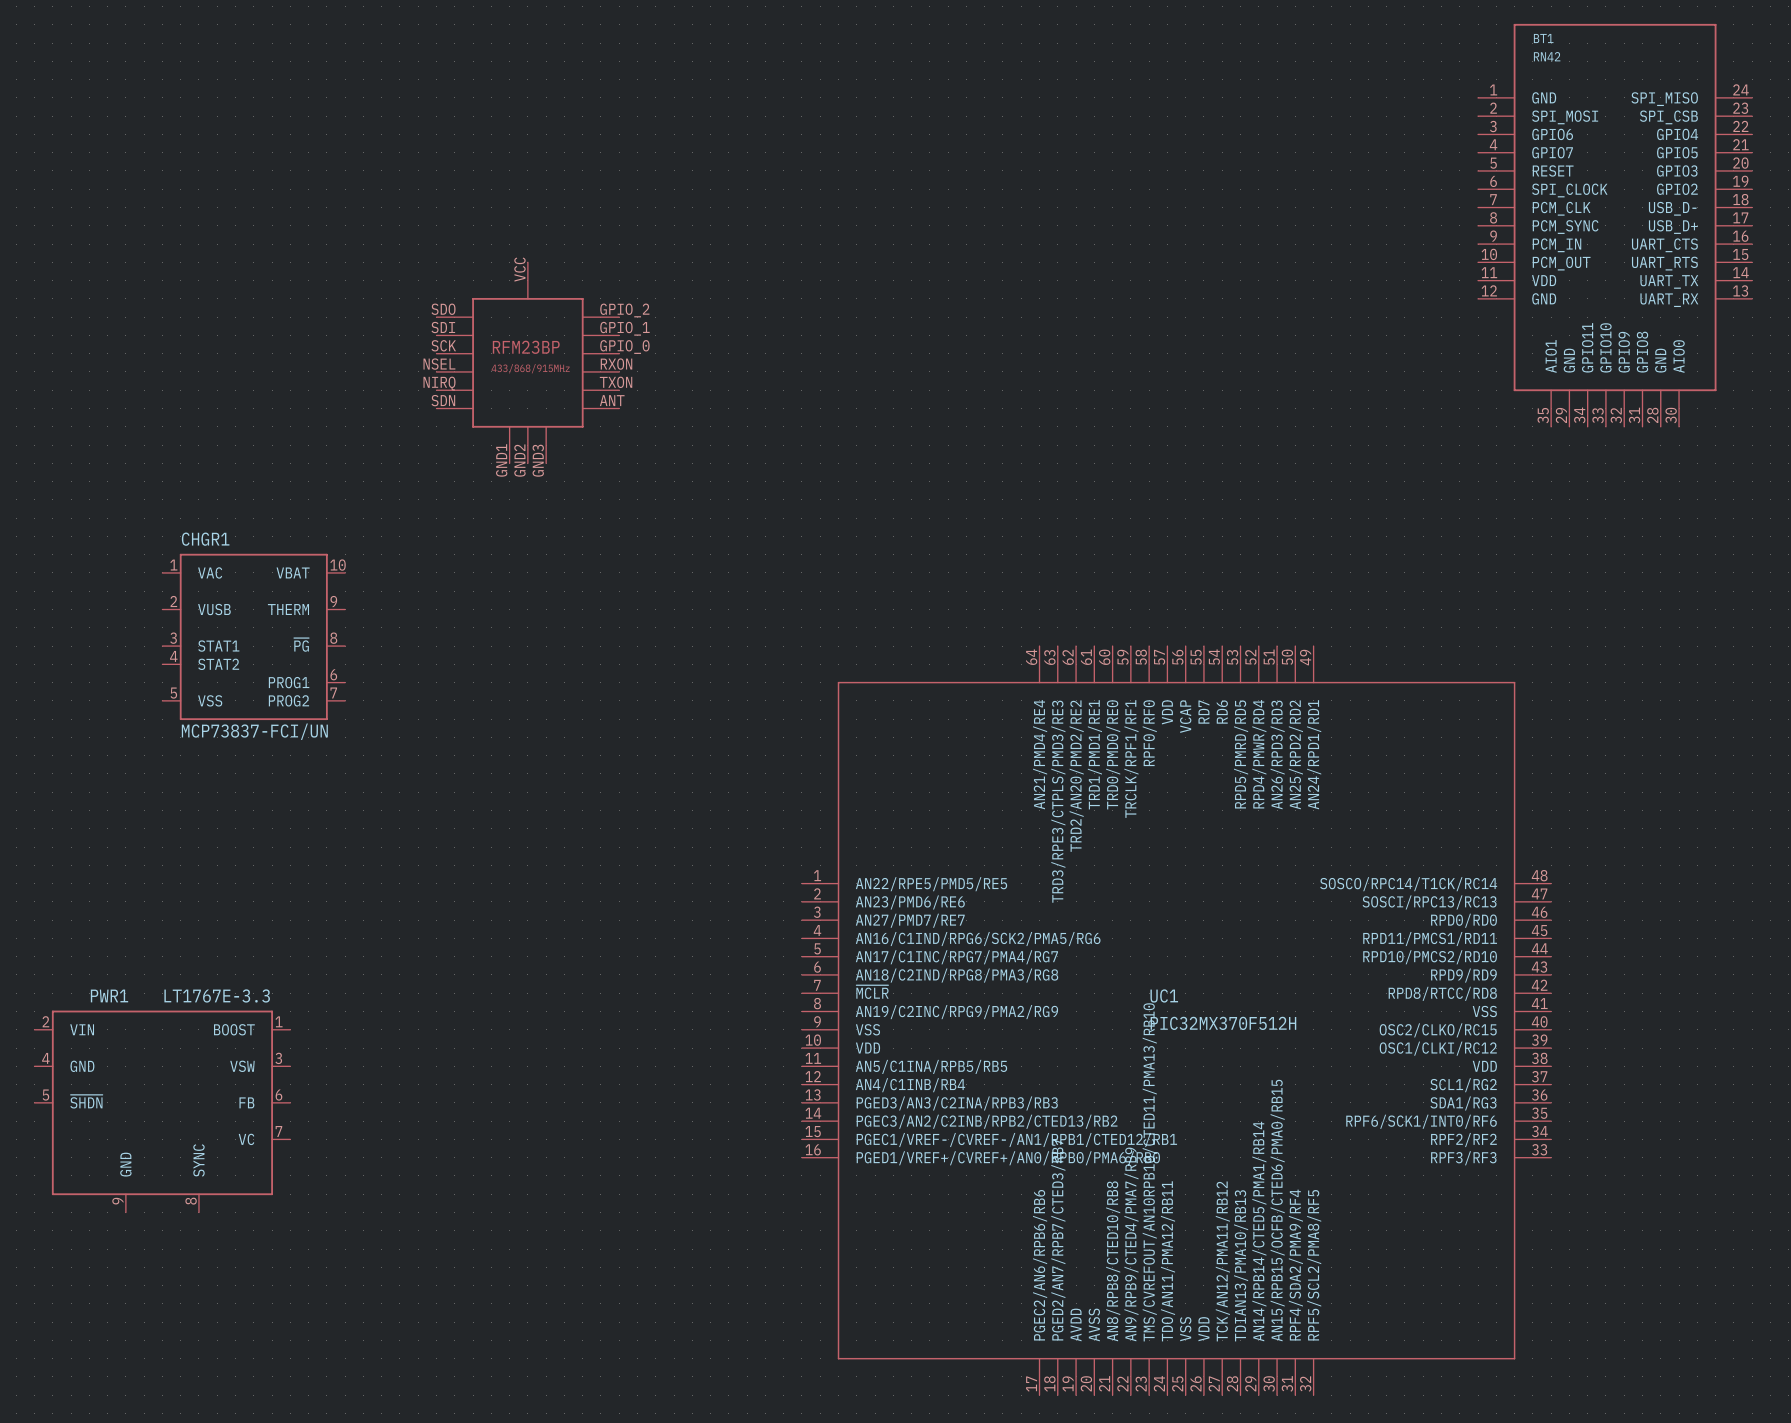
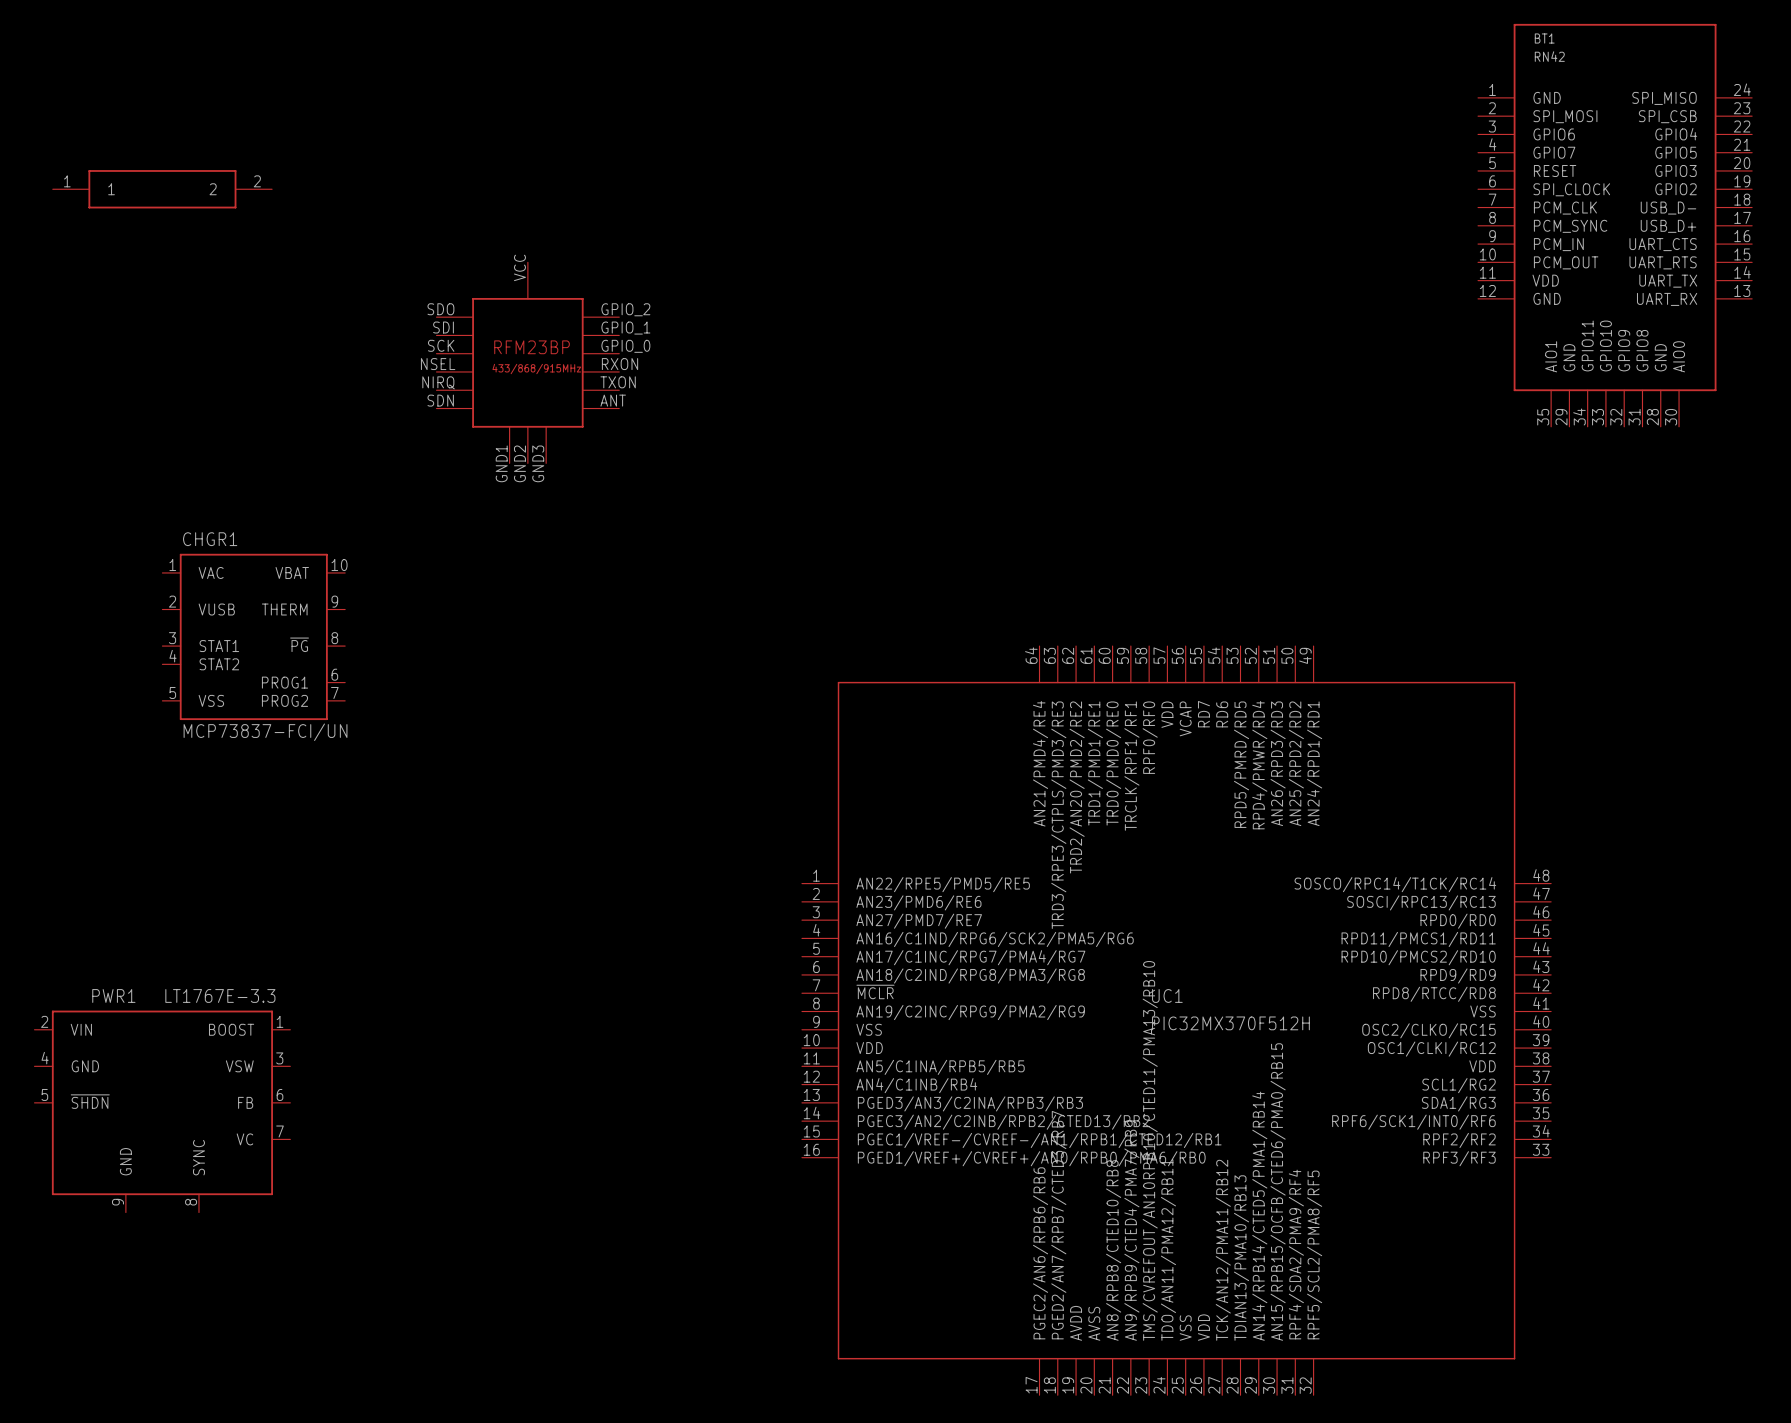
part: none -> (162, 189)

